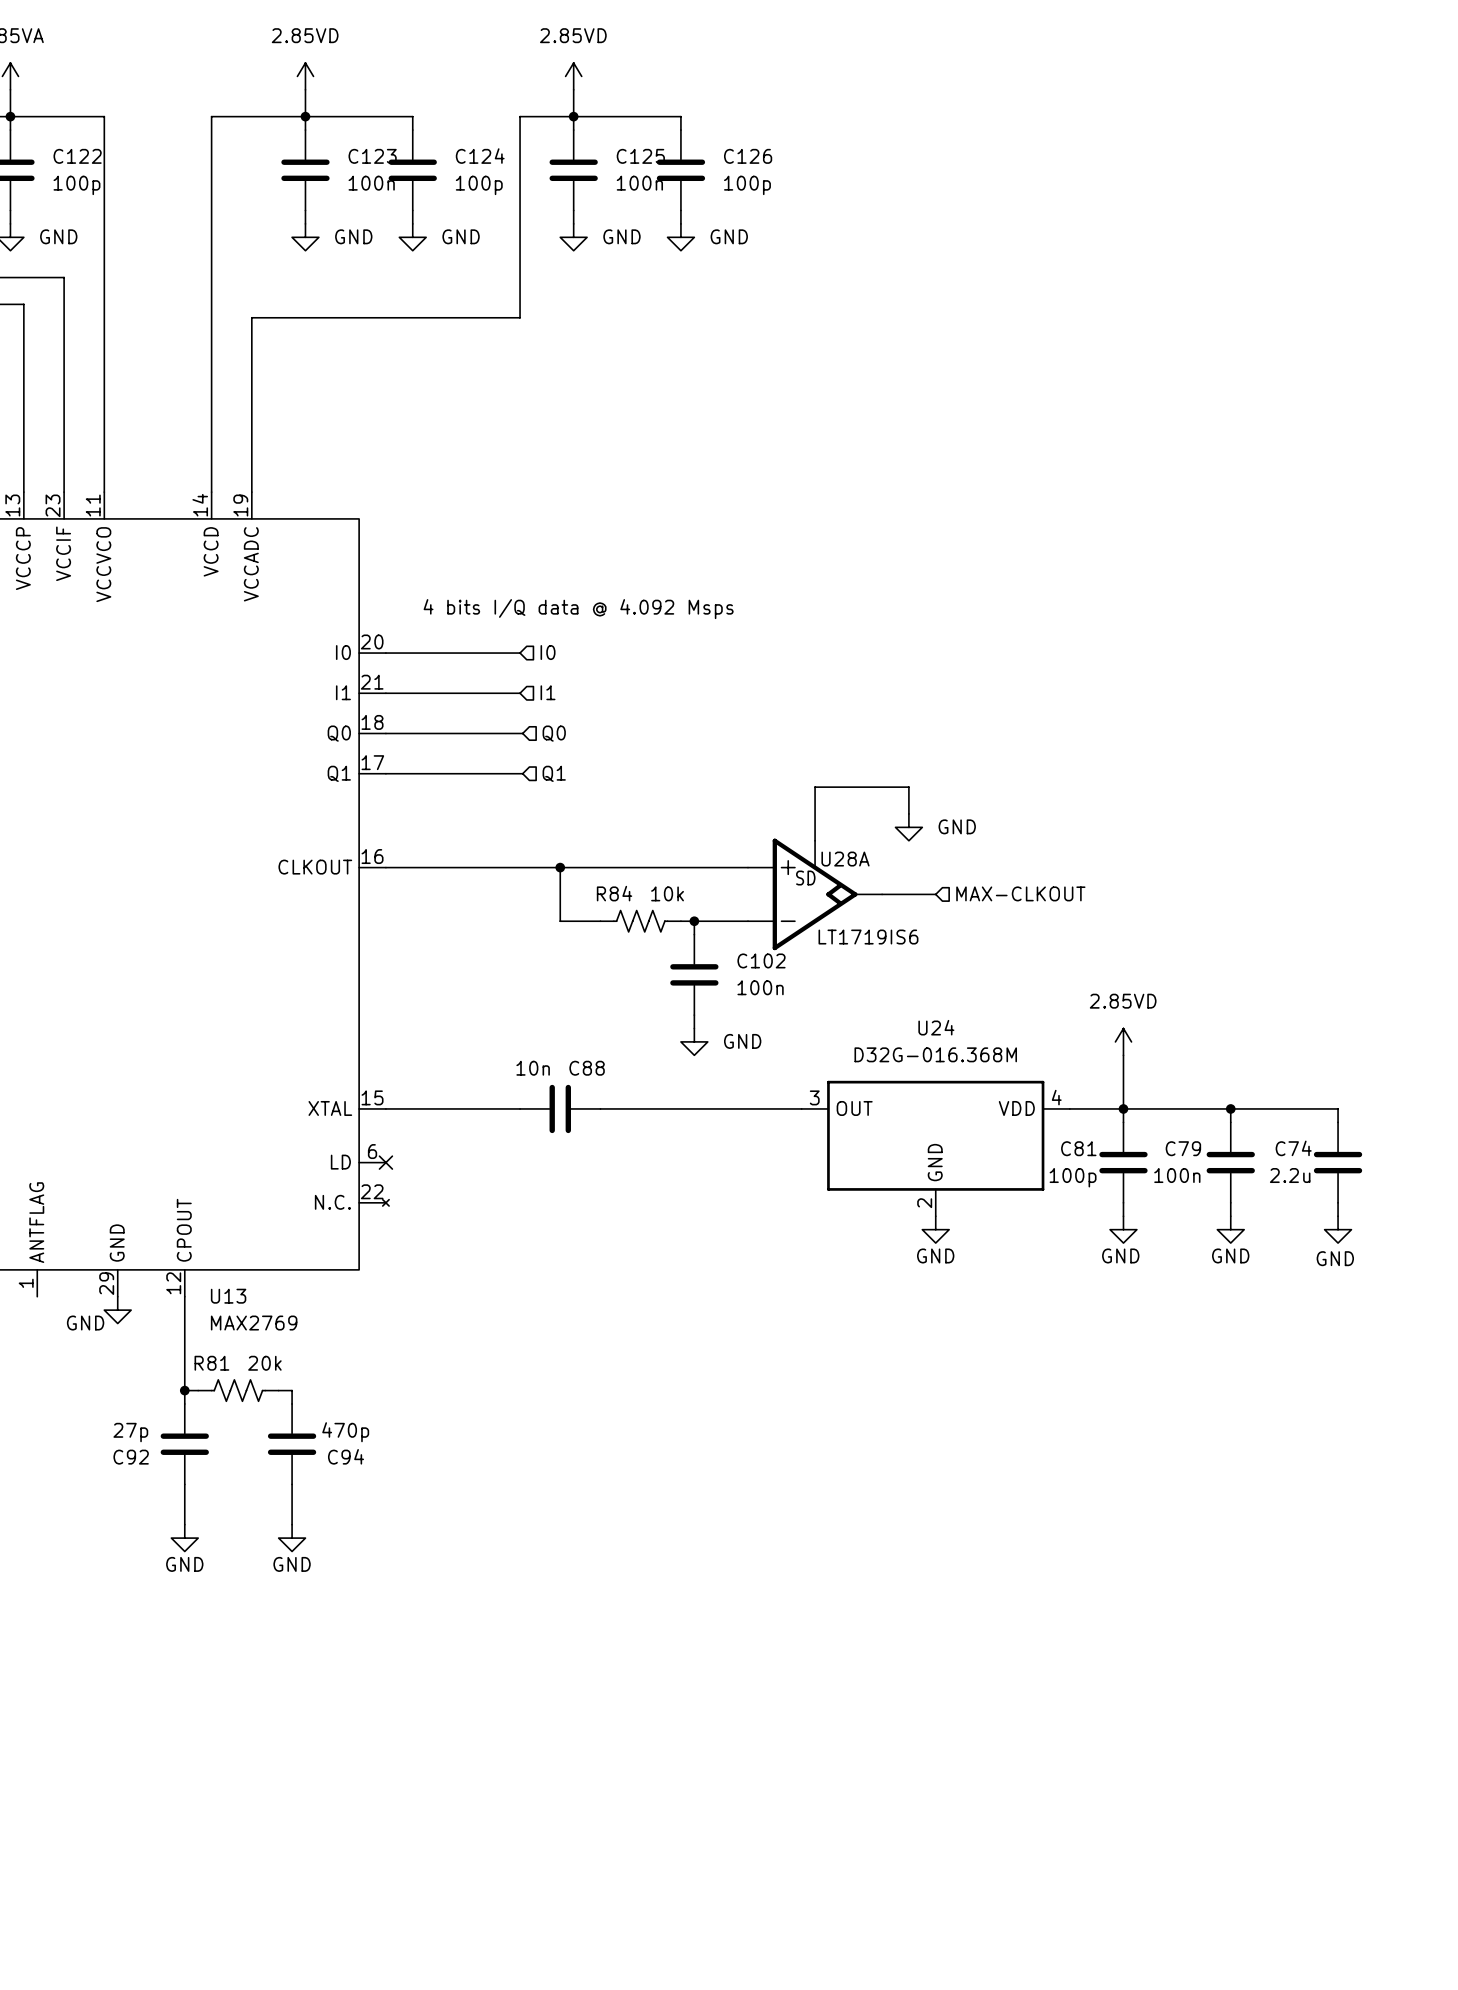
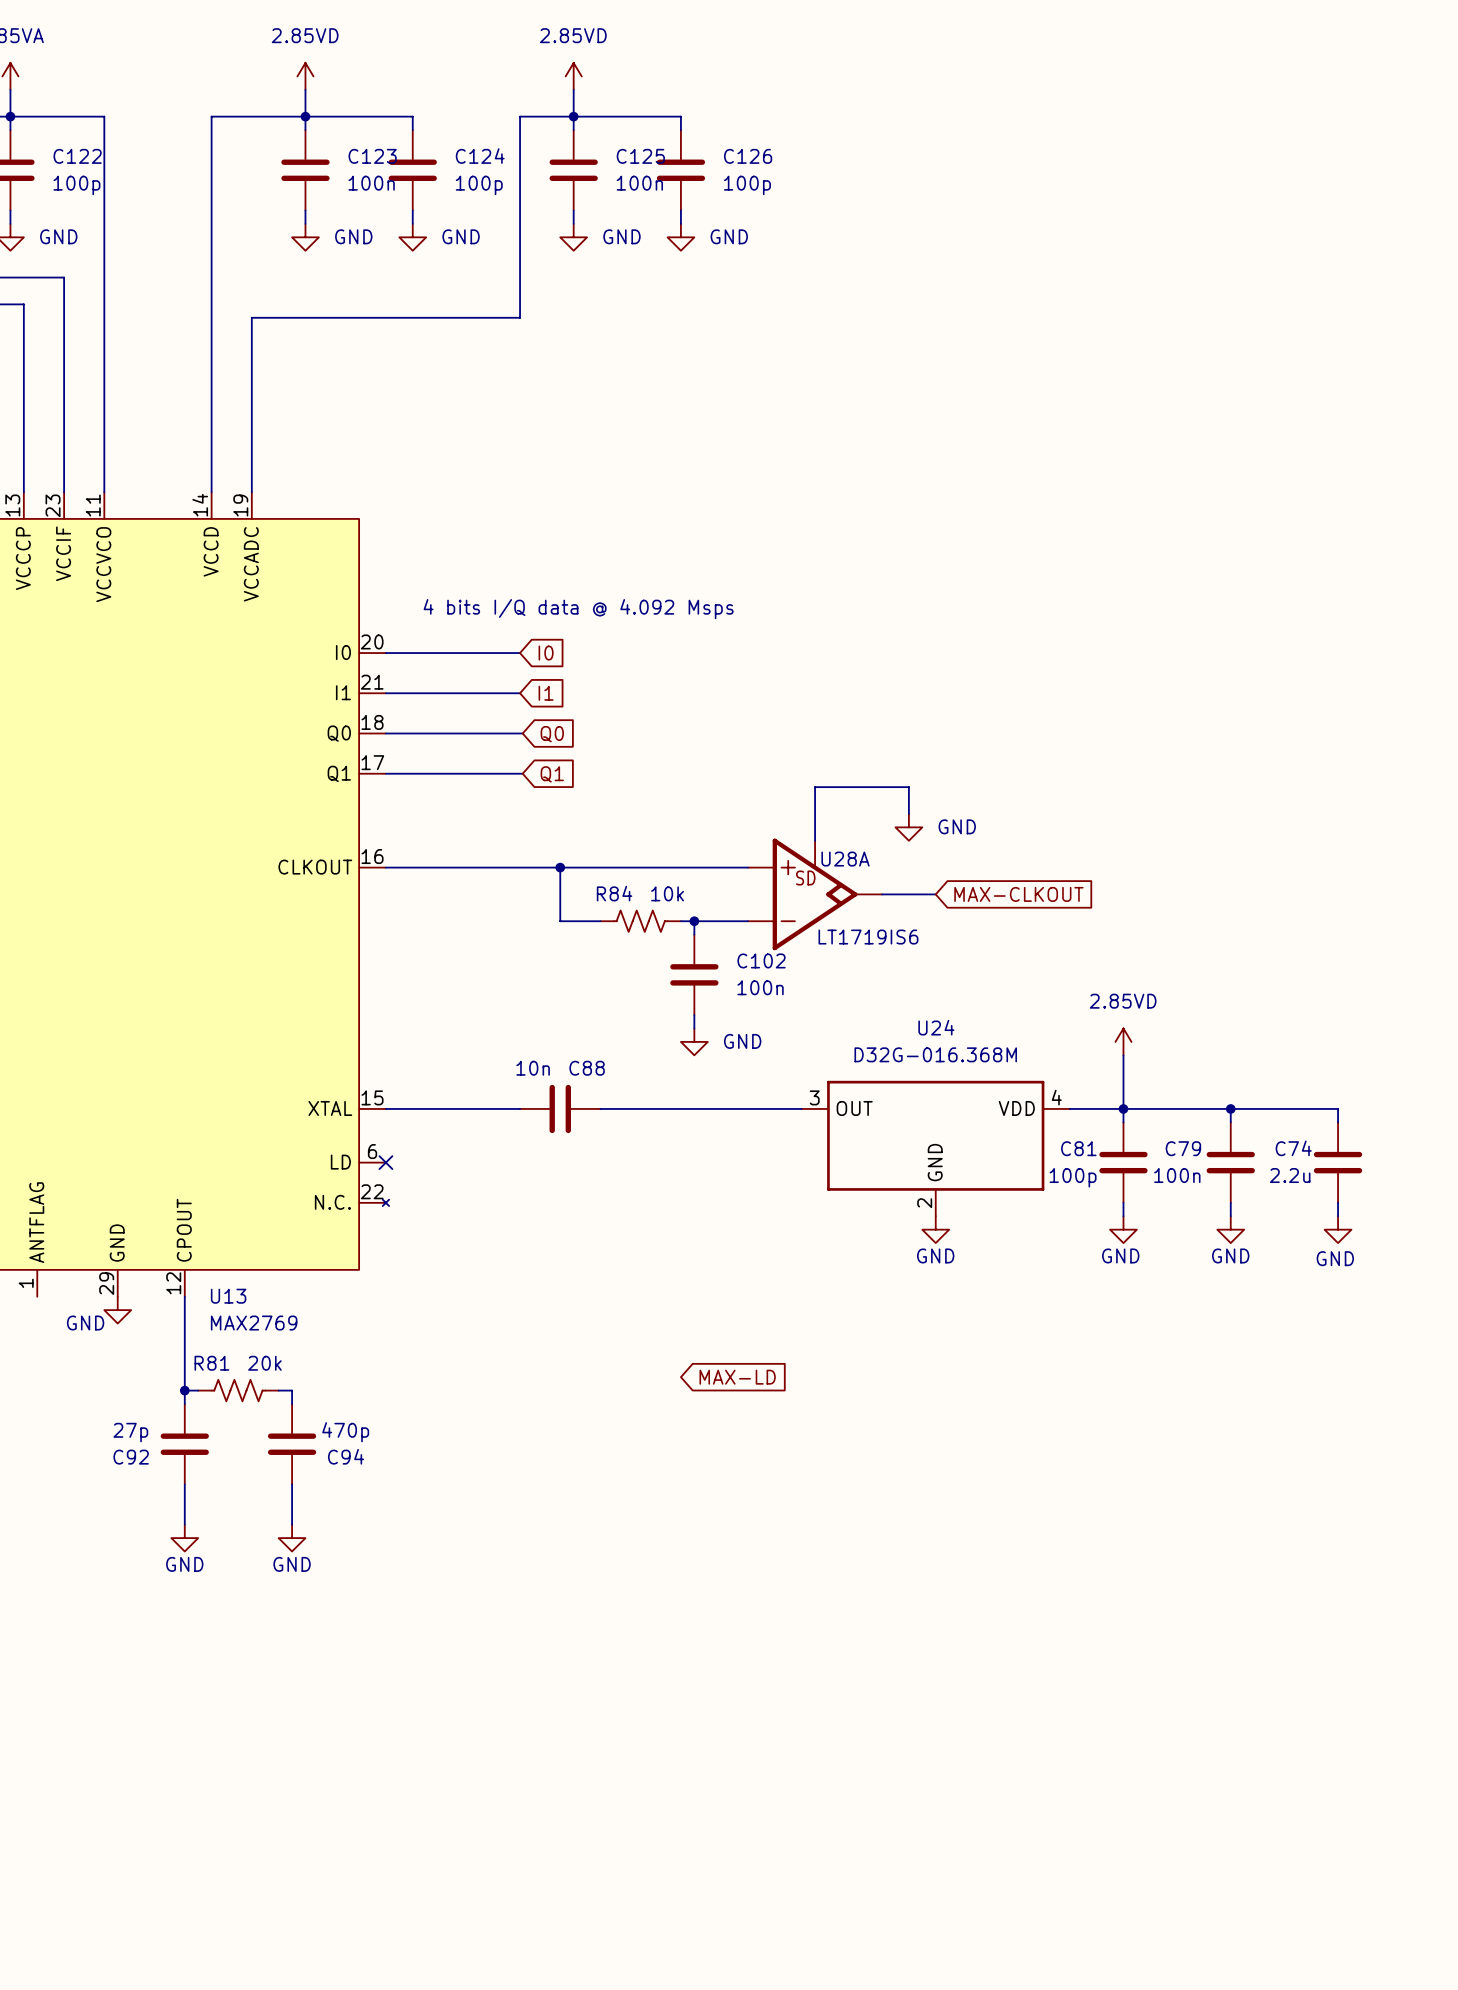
hierarchical label: I0 (548, 652) -> none
global label: none -> I0 (546, 653)
hierarchical label: I1 (548, 692) -> none
global label: none -> I1 (546, 693)
hierarchical label: Q0 (554, 733) -> none
global label: none -> Q0 (552, 734)
hierarchical label: Q1 (554, 773) -> none
global label: none -> Q1 (552, 774)
hierarchical label: MAX-CLKOUT (1020, 893) -> none
global label: none -> MAX-CLKOUT (1018, 894)
global label: none -> MAX-LD (737, 1377)

